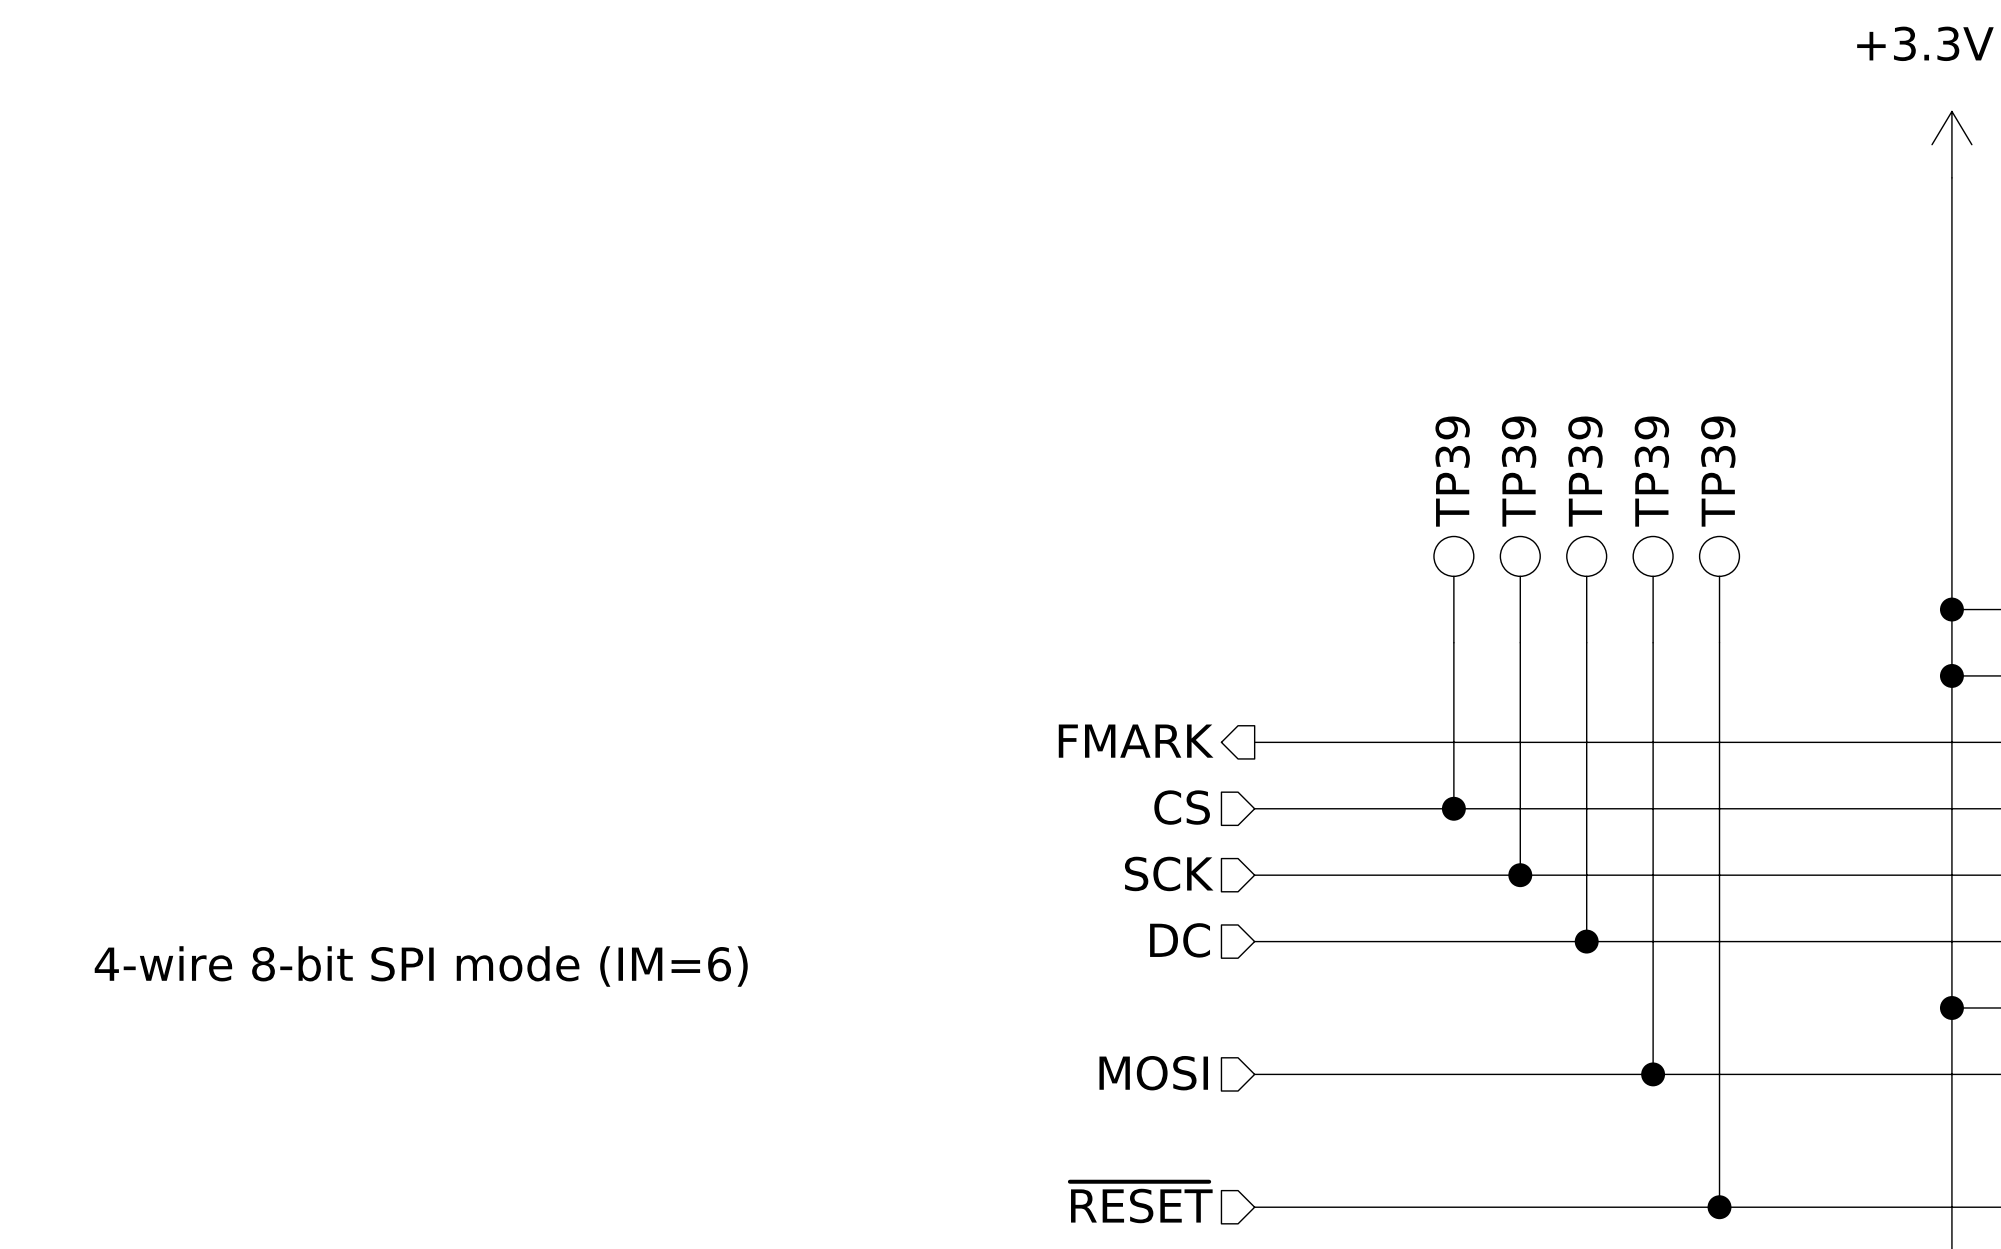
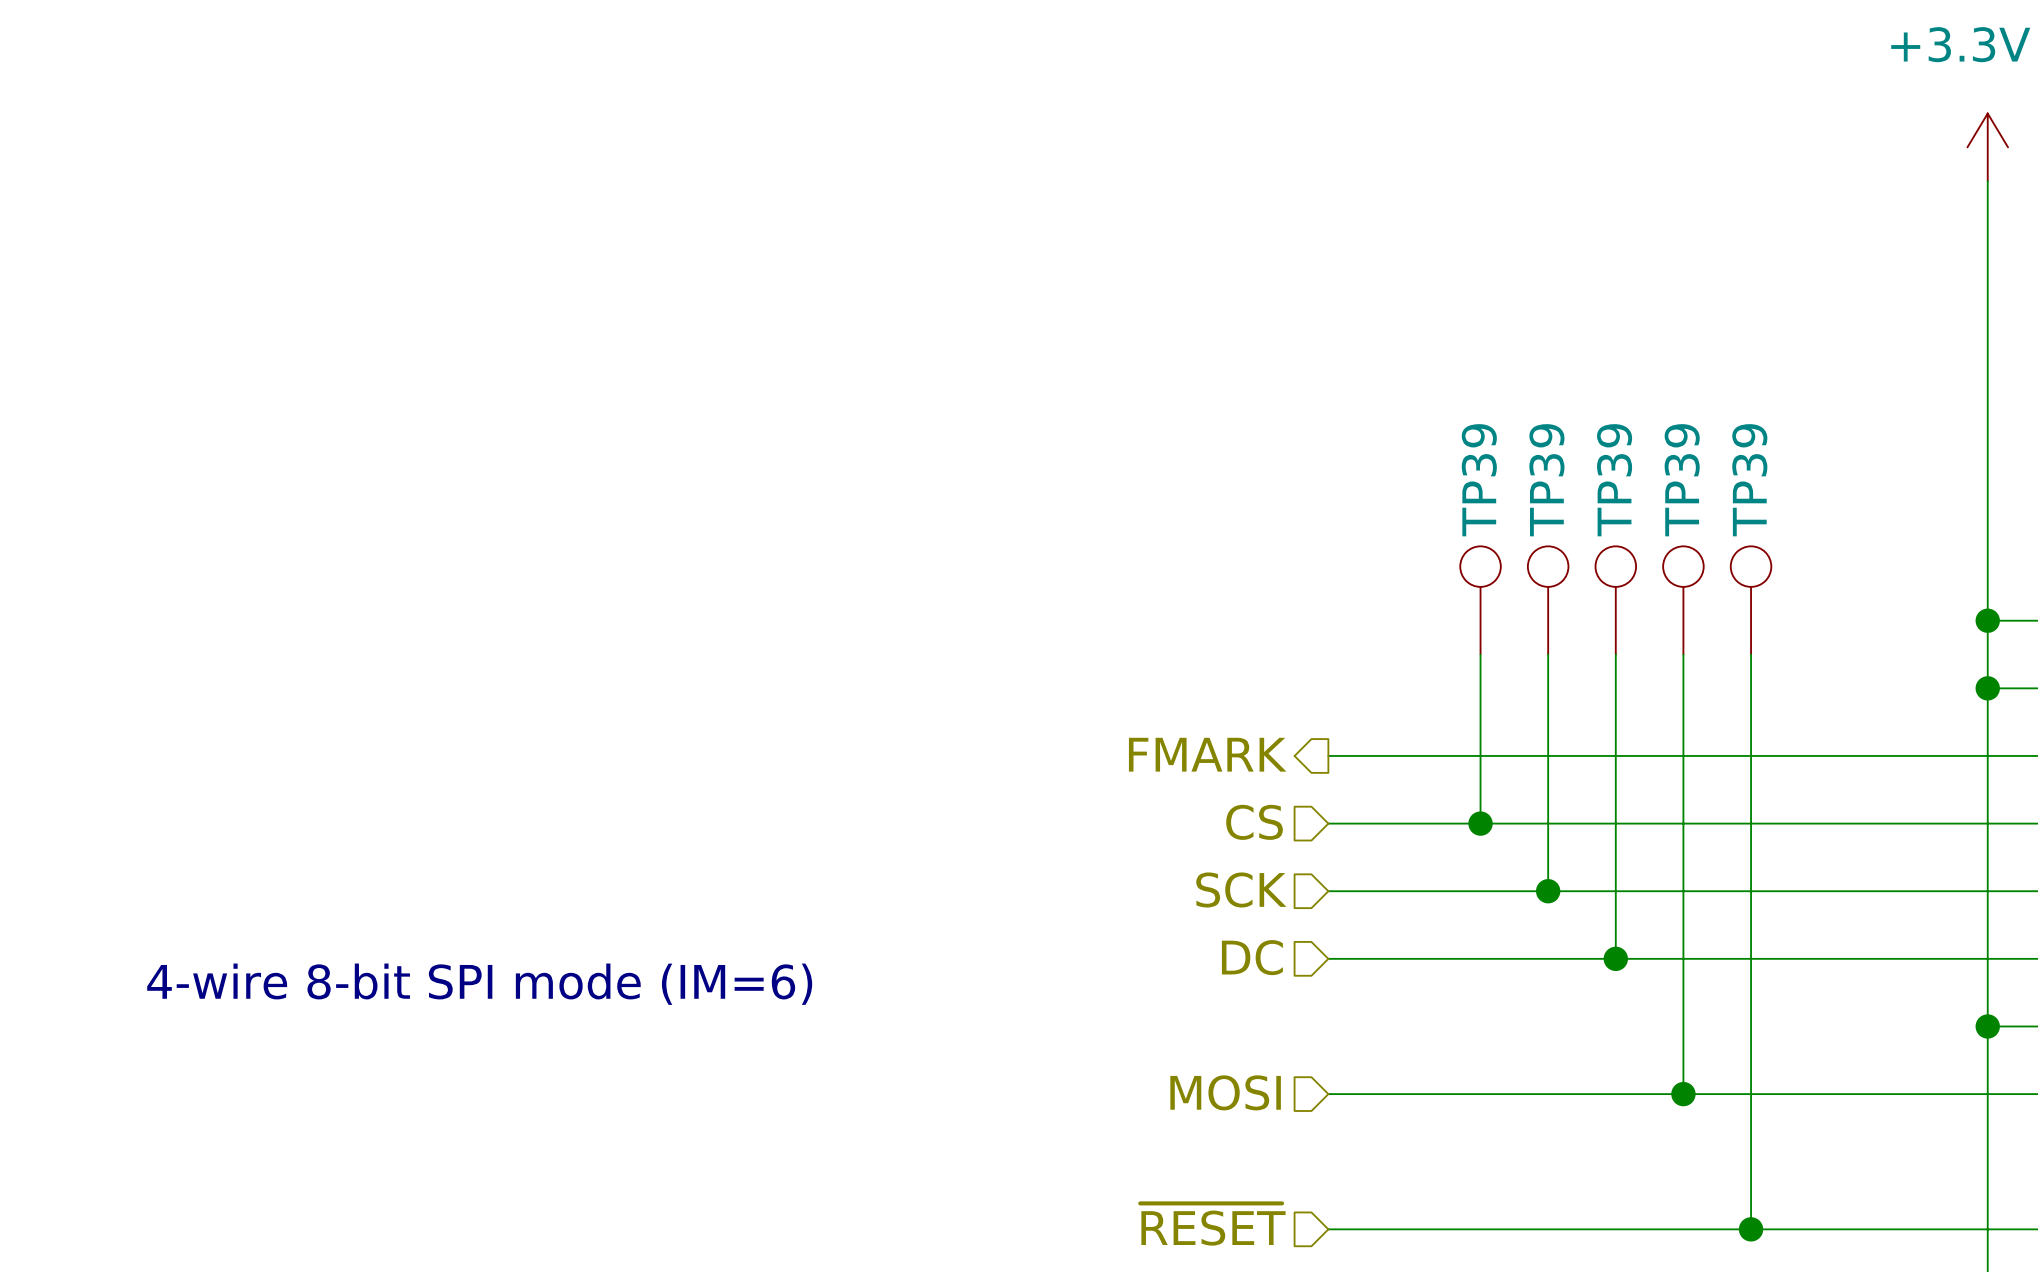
hierarchical label position: FMARK (1136, 741) -> FMARK (1207, 754)
wire: (1254, 742) (1304, 742) -> none
hierarchical label position: CS (1182, 807) -> CS (1254, 822)
wire: (1254, 808) (1304, 808) -> none
hierarchical label position: SCK (1169, 873) -> SCK (1241, 889)
wire: (1254, 875) (1304, 875) -> none
hierarchical label position: DC (1180, 940) -> DC (1252, 957)
wire: (1254, 941) (1304, 941) -> none
text position: 4-wire 8-bit SPI mode (IM=6) (421, 966) -> 4-wire 8-bit SPI mode (IM=6) (479, 984)
hierarchical label position: MOSI (1153, 1073) -> MOSI (1225, 1092)
wire: (1254, 1074) (1304, 1074) -> none
hierarchical label position: ~{RESET} (1141, 1202) -> ~{RESET} (1212, 1224)
wire: (1254, 1207) (1304, 1207) -> none

